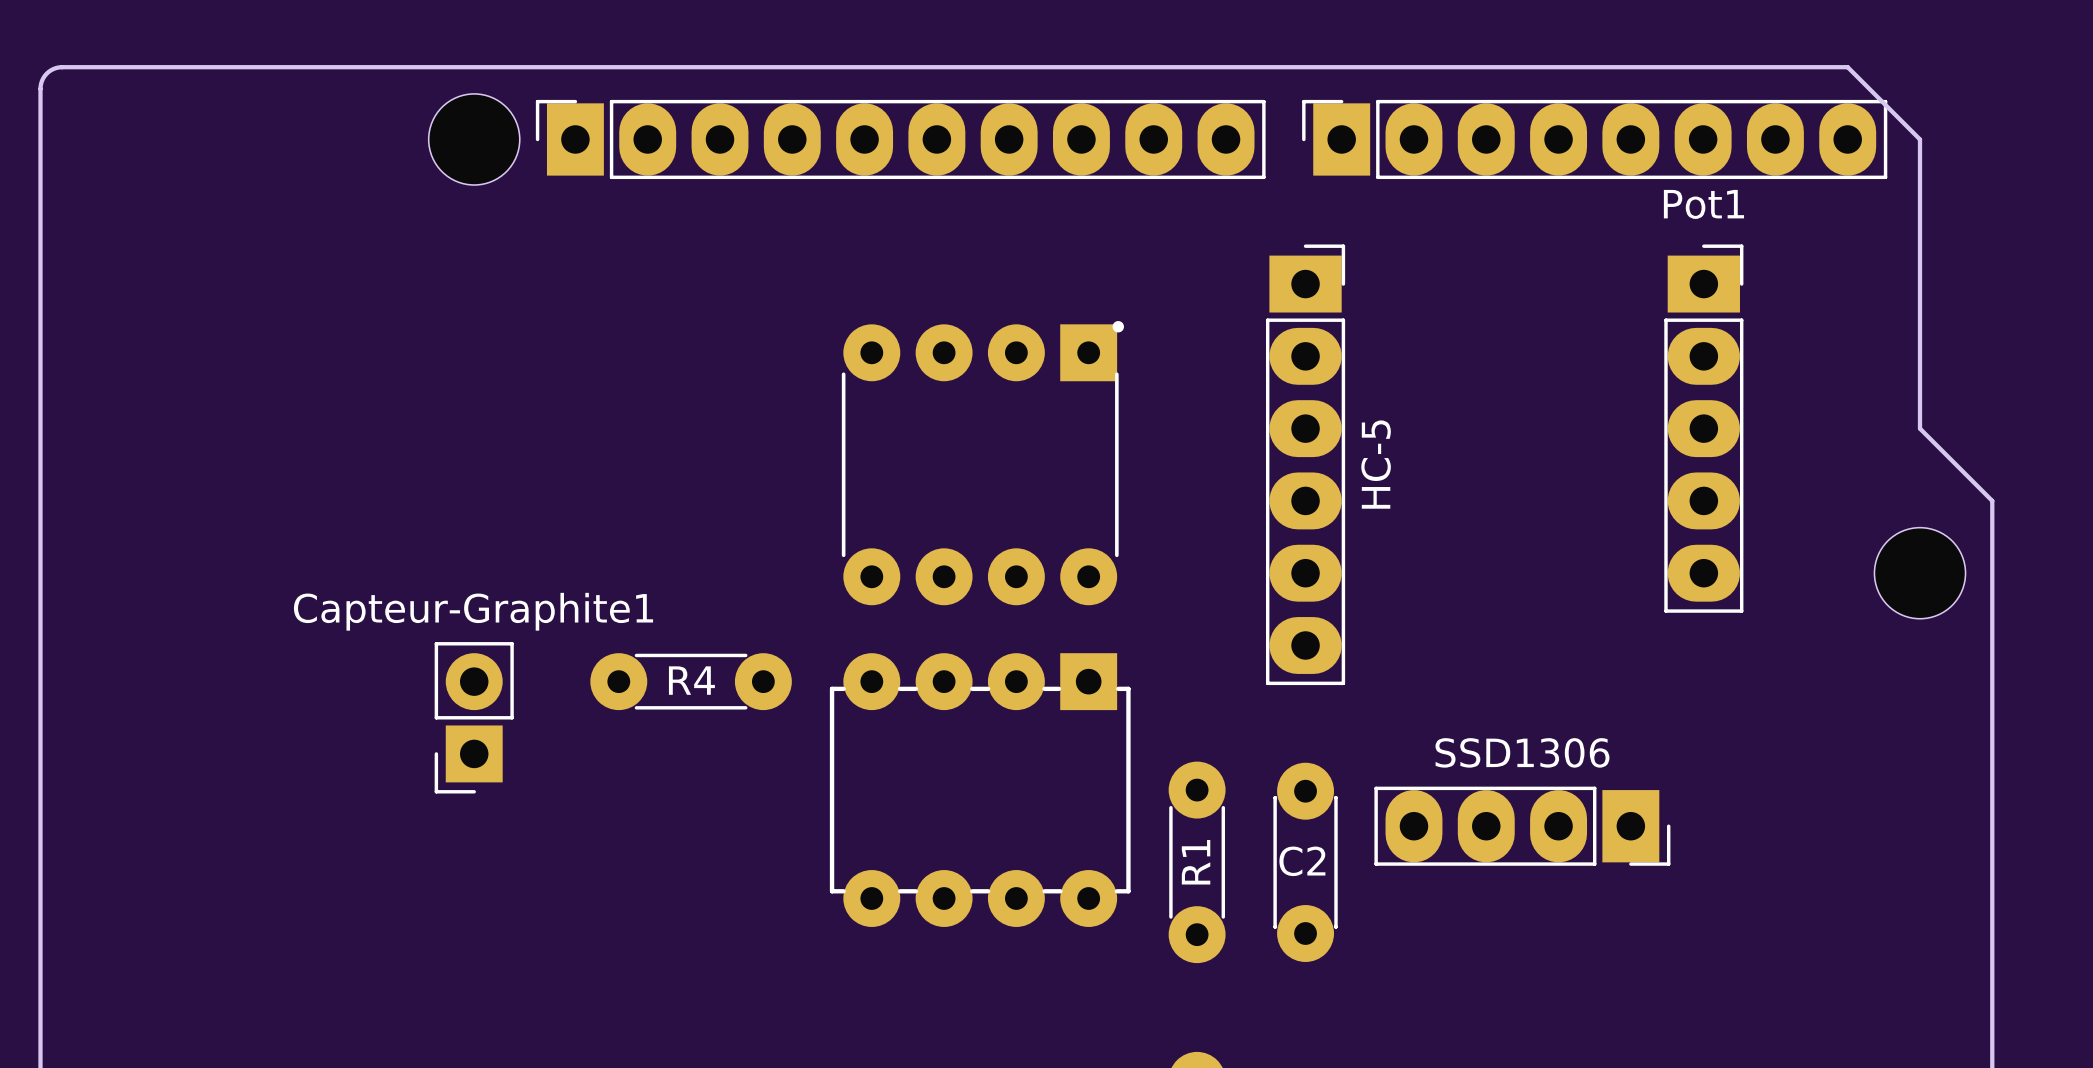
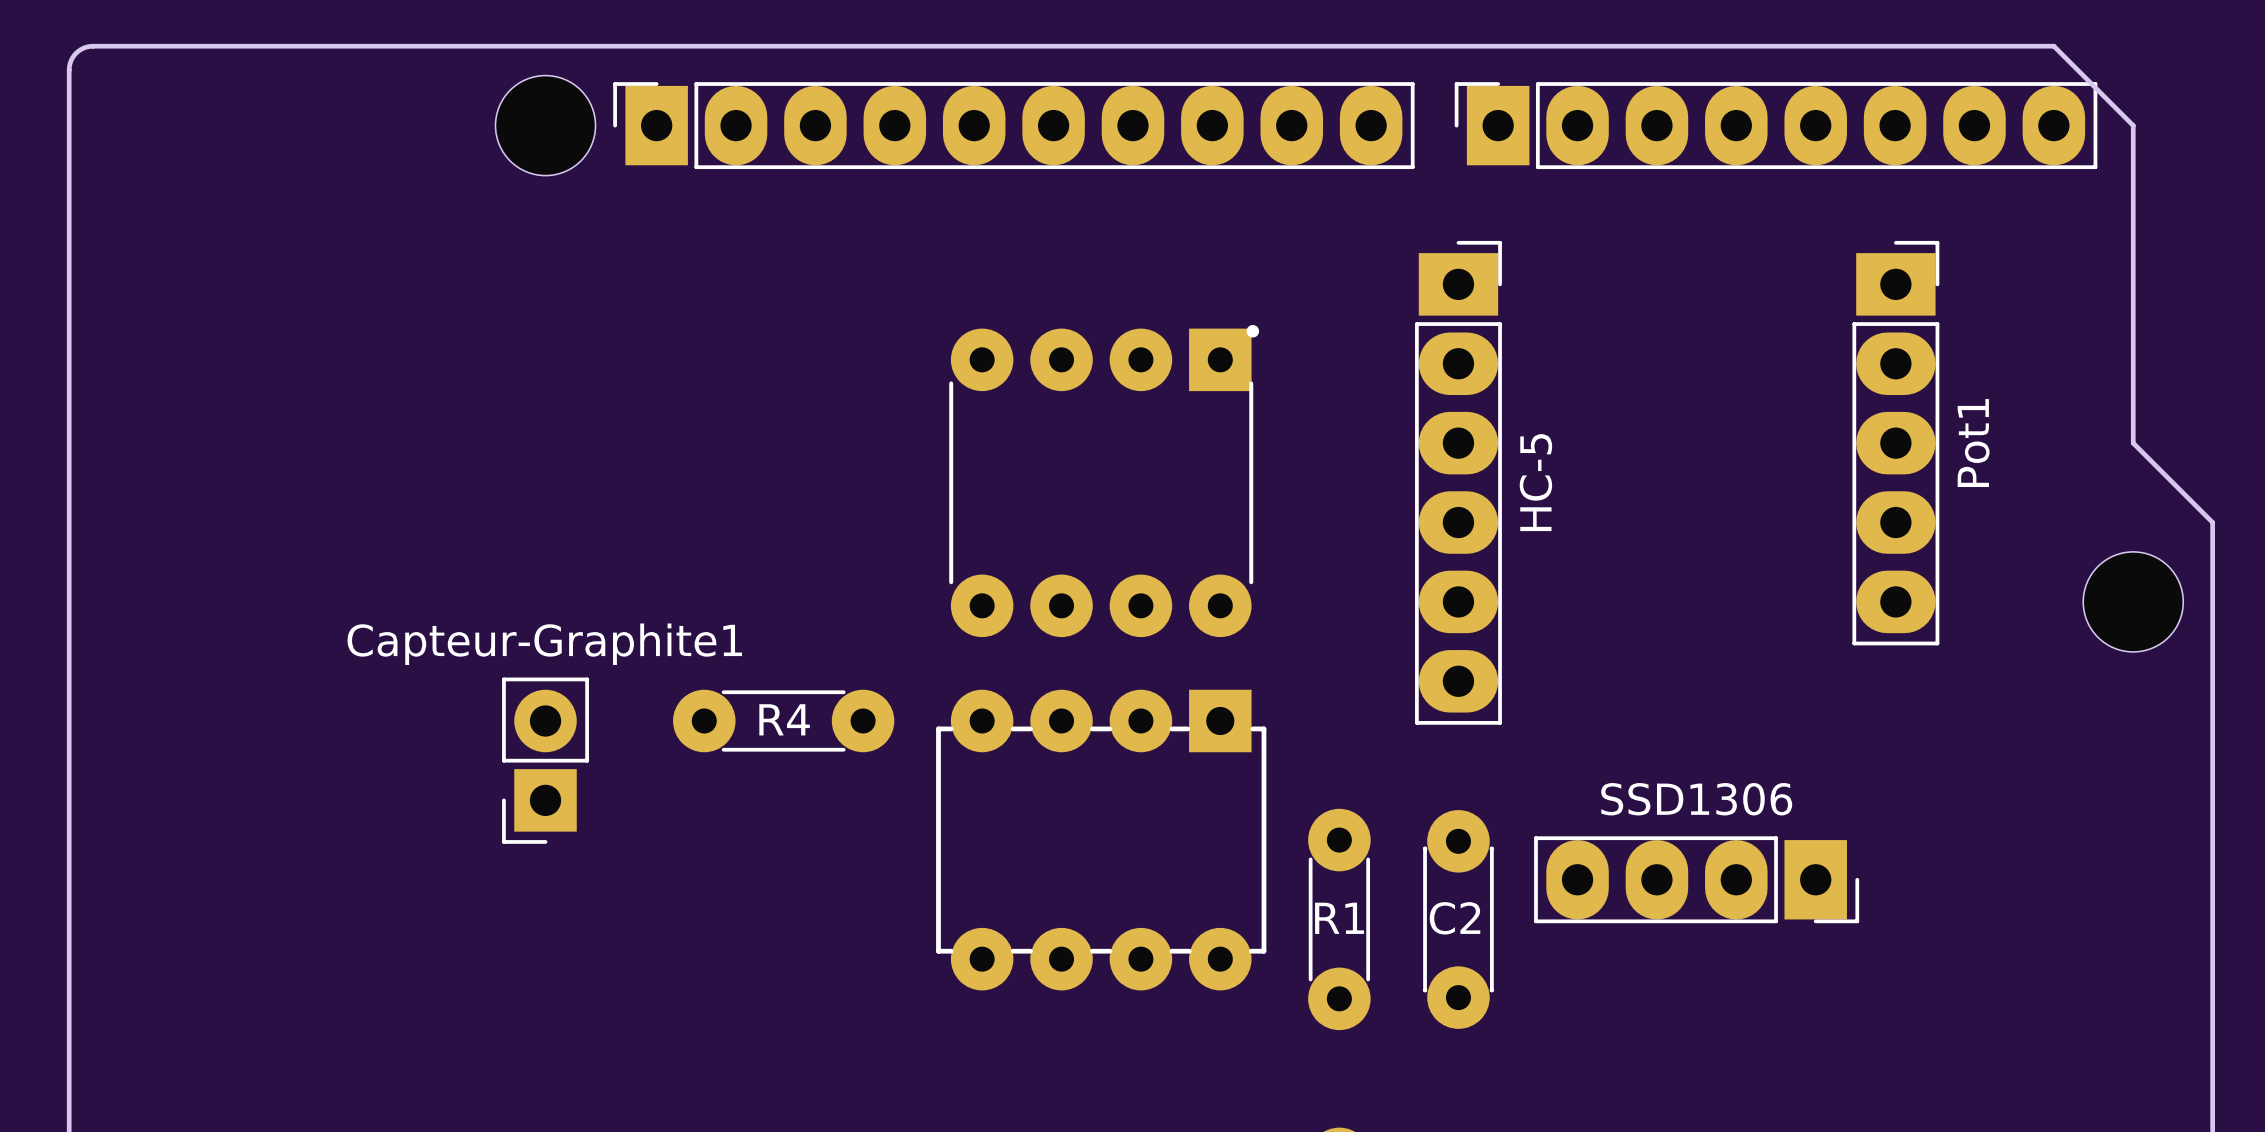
Pot1 name rotation: 0° (1703, 204) -> 90° counterclockwise (1973, 443)
Pot1 name position: Pot1 (1703, 204) -> Pot1 (1973, 443)
R1 name rotation: 0° (1196, 862) -> 90° clockwise (1339, 918)

